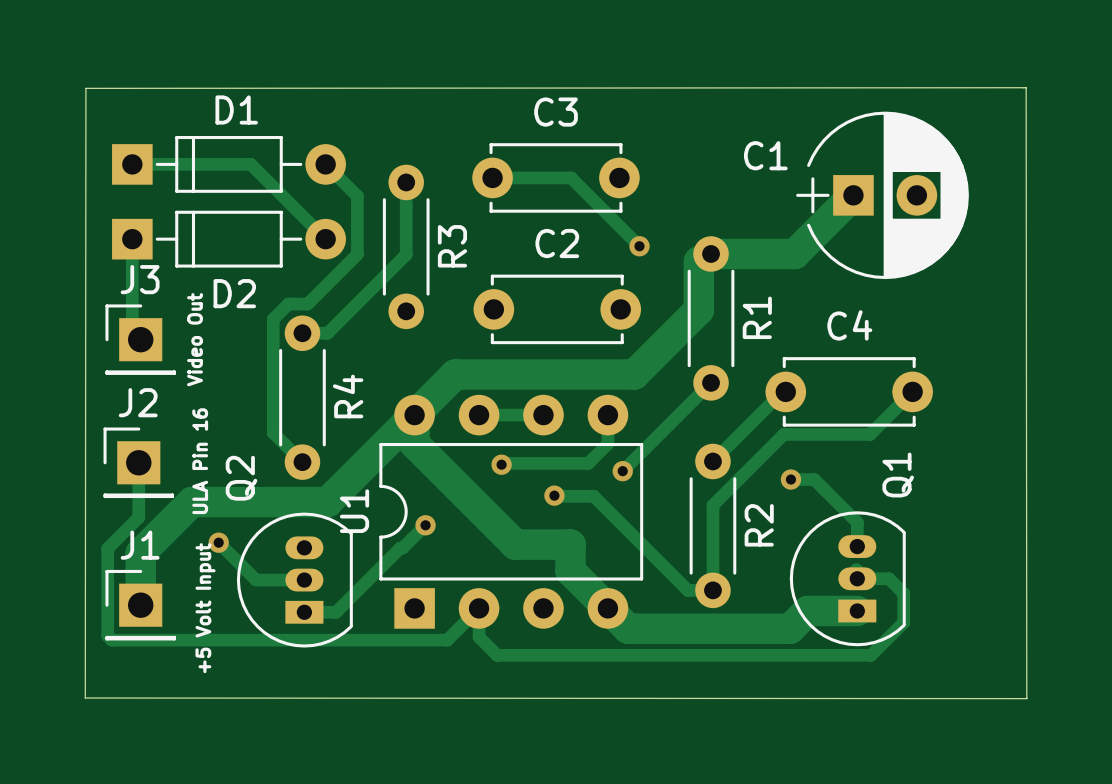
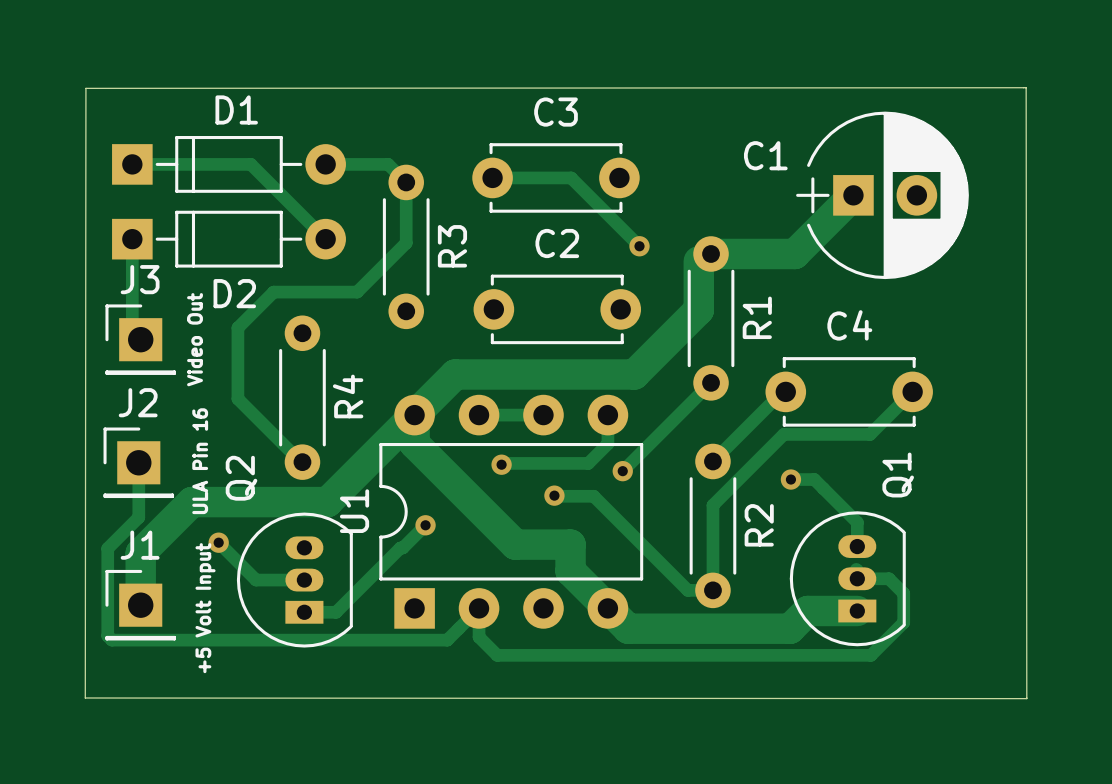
track: (325, 164) (357, 196) (357, 254) (307, 304) (288, 304) (273, 319) (273, 432) (302, 462) -> (406, 243) (357, 292) (273, 292) (237, 327) (237, 398) (301, 462)
track: none -> (325, 164) (388, 164) (406, 182)
track: (406, 243) (406, 254) (327, 333) (302, 333) -> none

